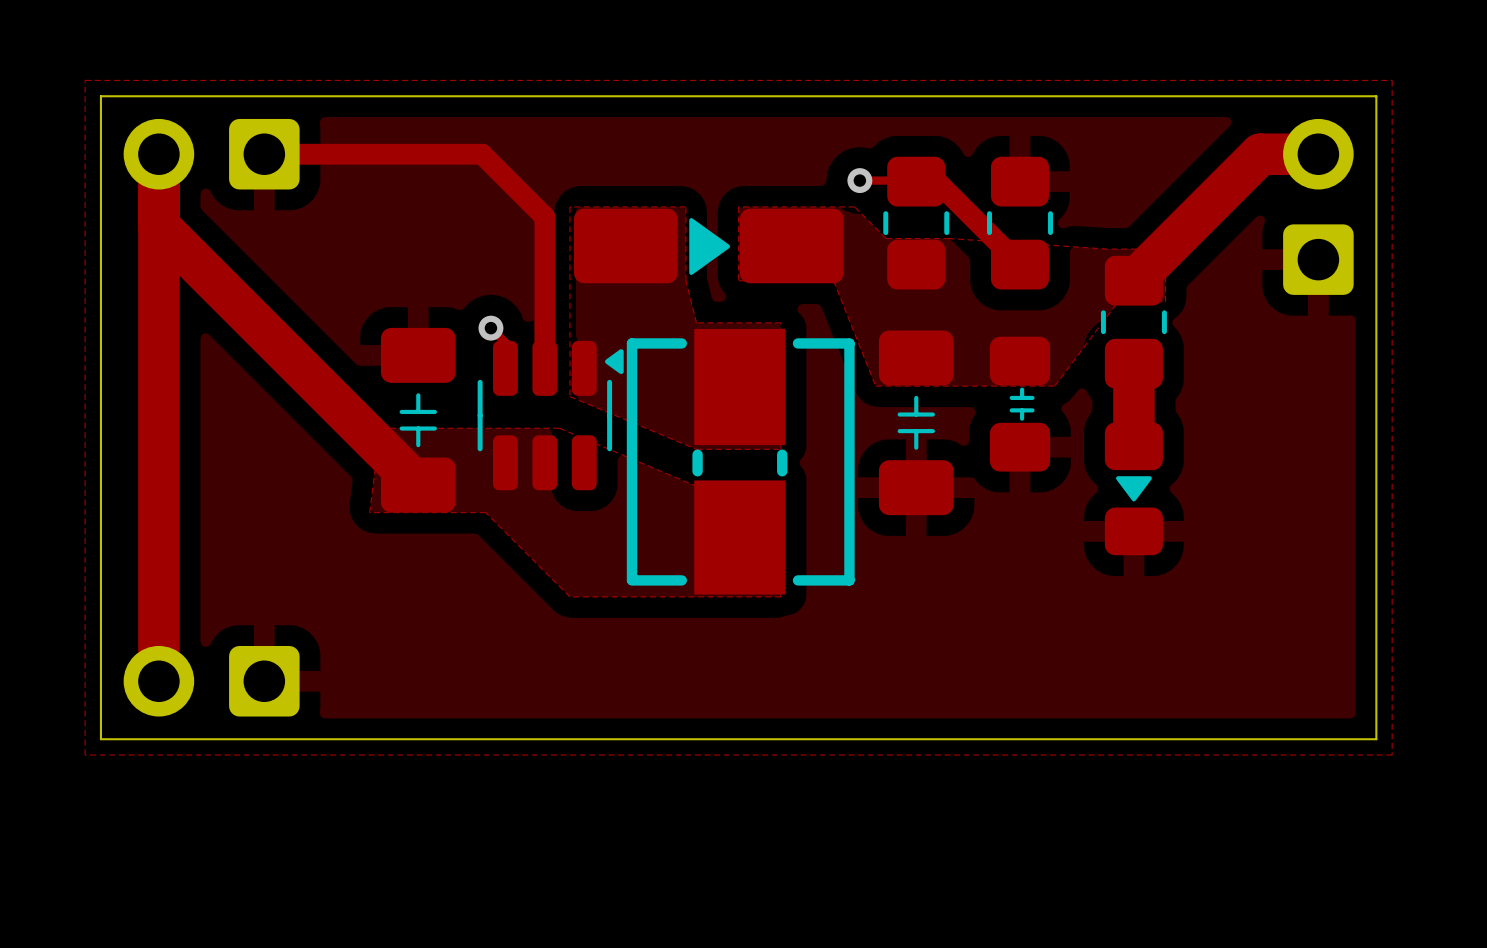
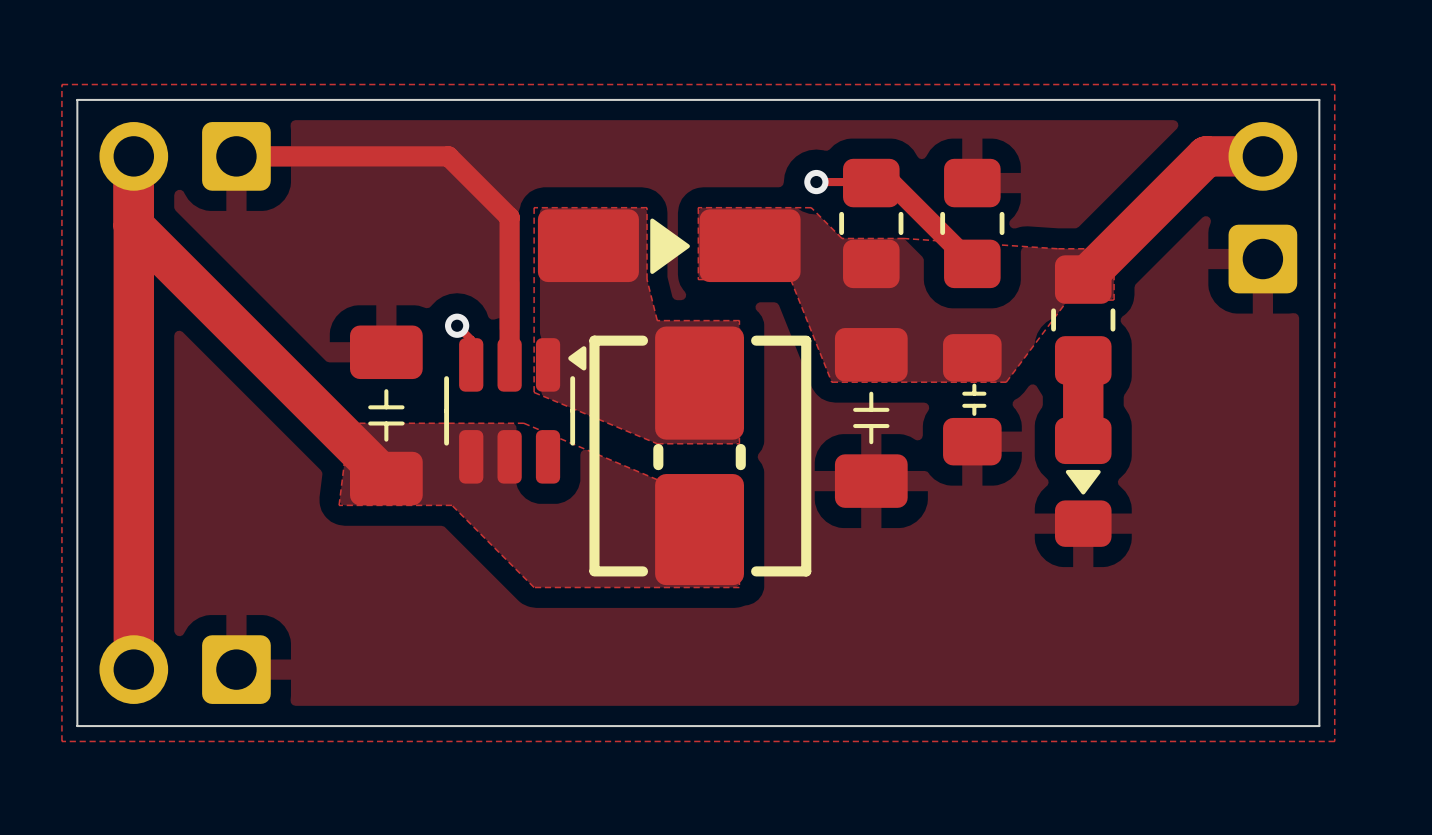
part footprint: [626, 328, 855, 595] -> [589, 326, 812, 586]

